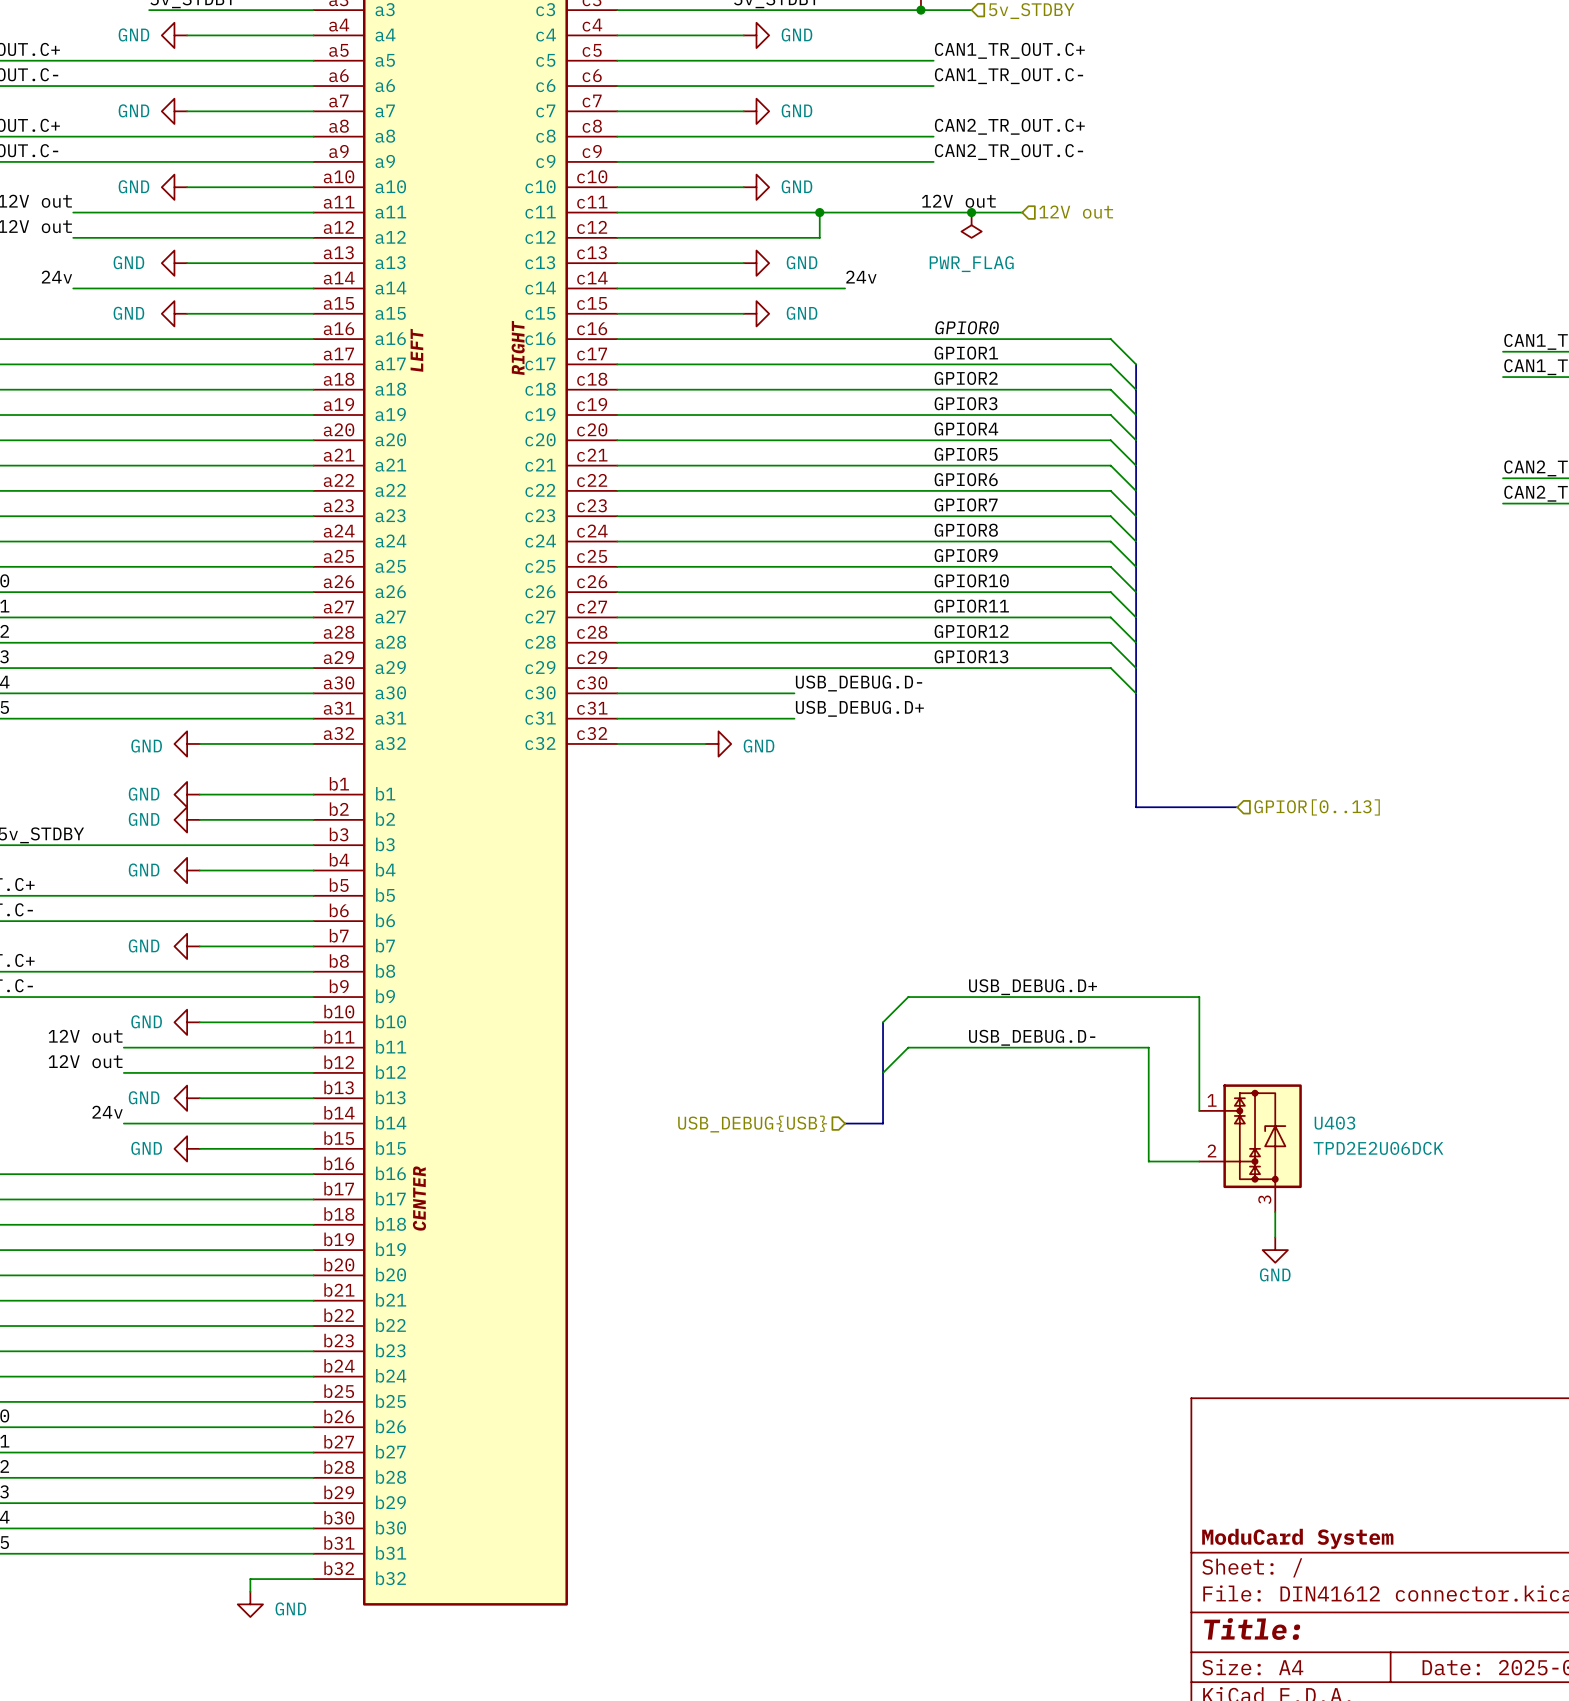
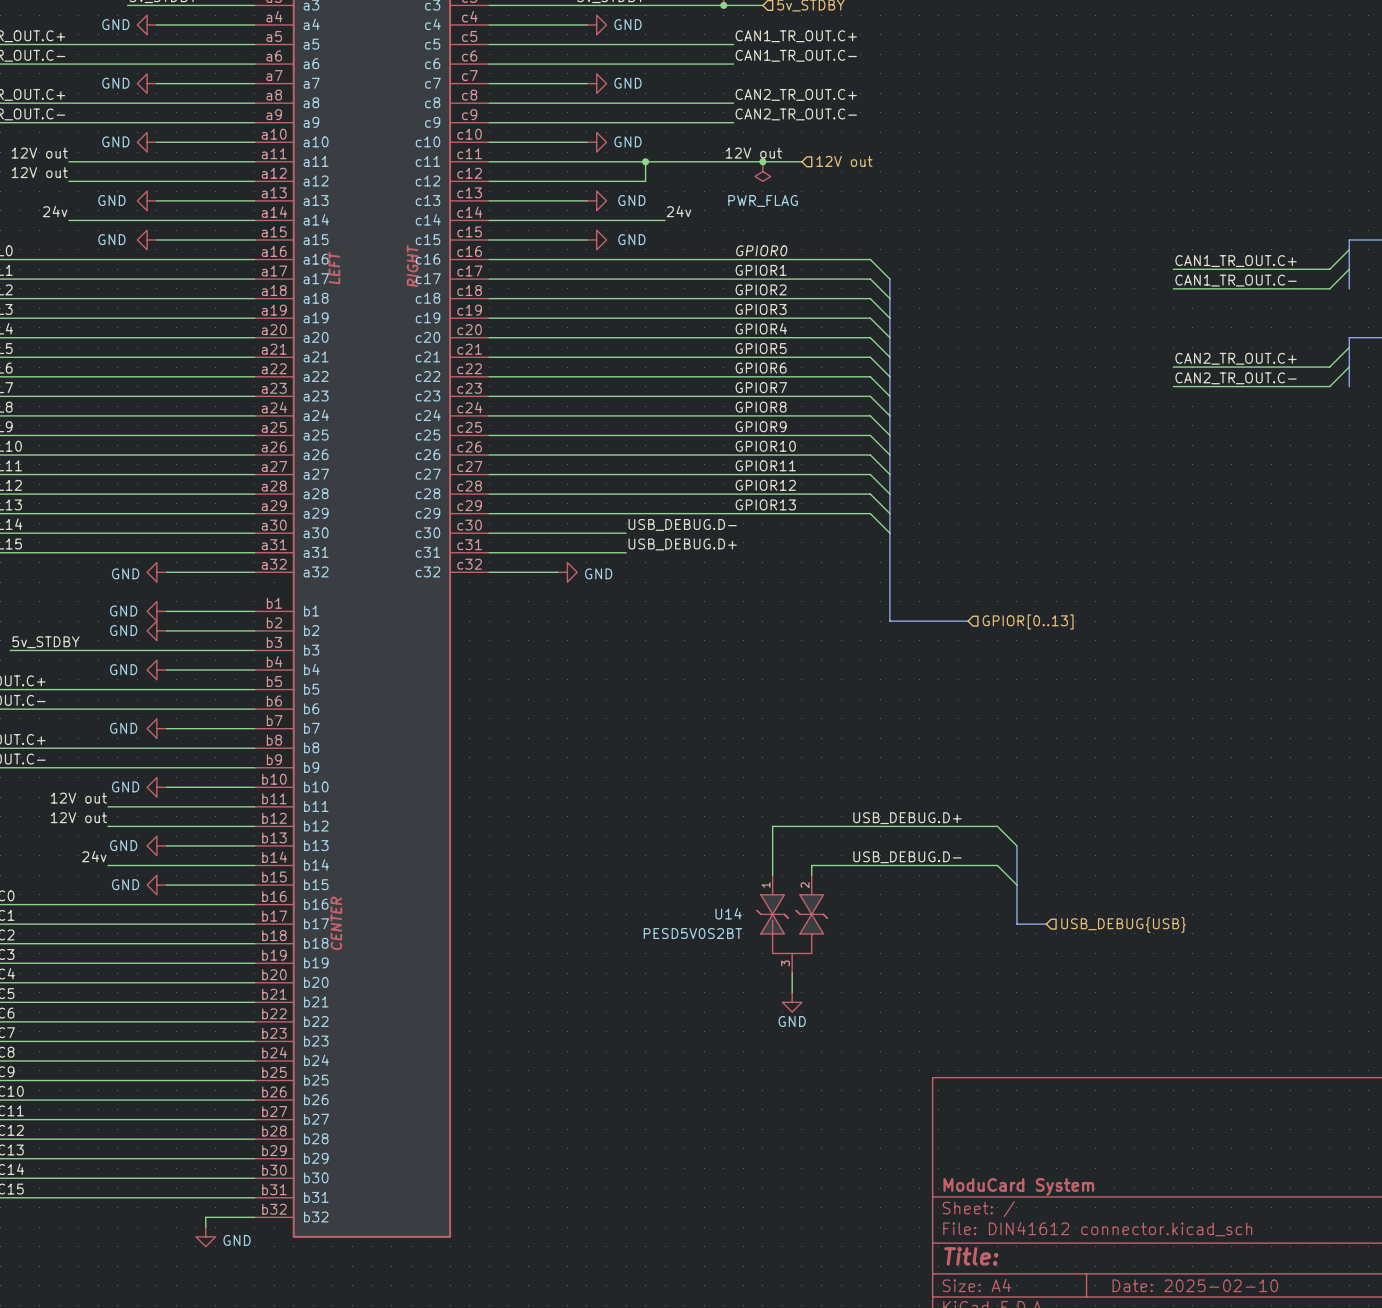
label position: USB_DEBUG.D+ (1033, 987) -> USB_DEBUG.D+ (907, 818)
wire: (883, 1022) (908, 997) (1199, 997) (1199, 1110) -> none
bus: (883, 1022) (883, 1123) (845, 1123) -> none
label position: USB_DEBUG.D- (1032, 1037) -> USB_DEBUG.D- (907, 857)
wire: (883, 1072) (908, 1047) (1148, 1047) (1148, 1161) (1199, 1161) -> none
wire: none -> (1016, 845) (997, 826) (772, 826) (772, 875)
bus: none -> (1016, 845) (1016, 924) (1046, 924)
hierarchical label: USB_DEBUG{USB} (752, 1124) -> none
wire: none -> (811, 875) (811, 865) (997, 865) (1016, 885)
U403: TPD2E2U06DCK (1250, 1148) -> none
U14: none -> PESD5V0S2BT (792, 924)
hierarchical label: none -> USB_DEBUG{USB} (1123, 924)
wire: (1275, 1212) (1275, 1237) -> none
power symbol: GND (1275, 1250) -> none
wire: none -> (792, 973) (792, 992)
power symbol: none -> GND (792, 1002)

